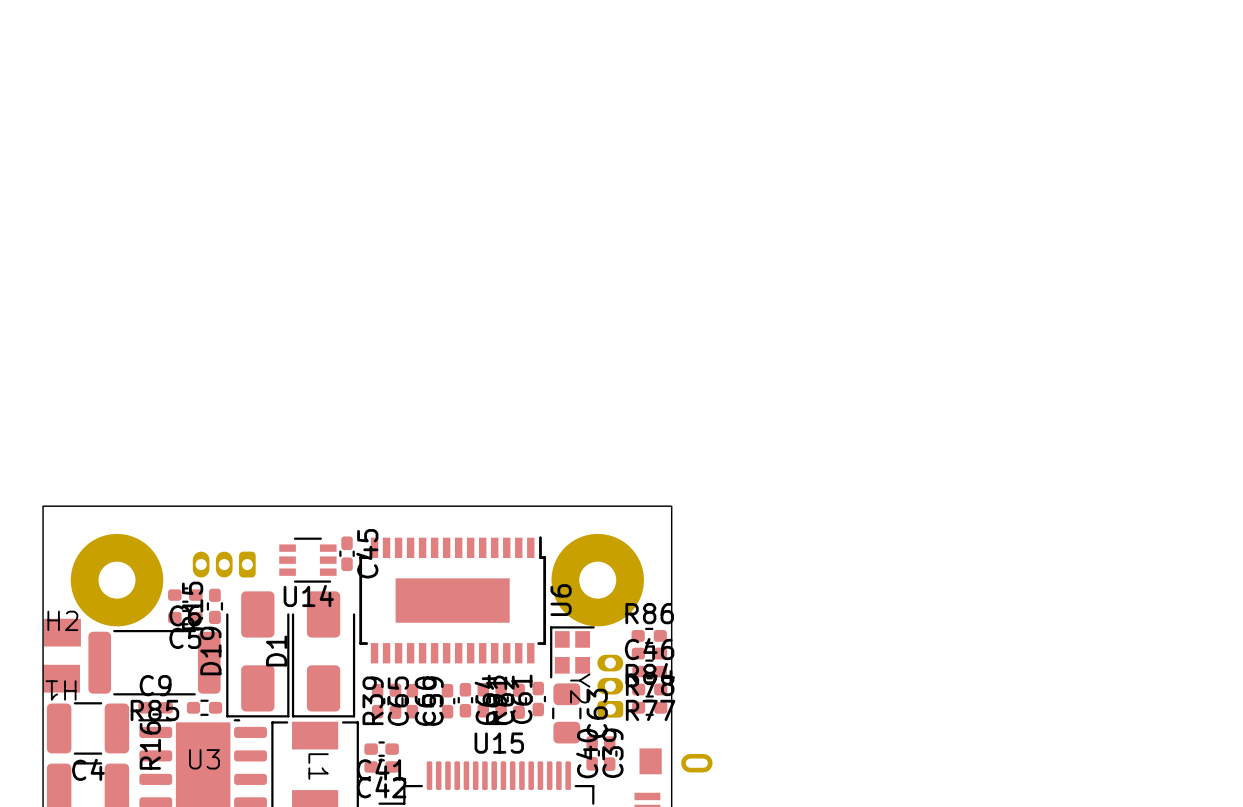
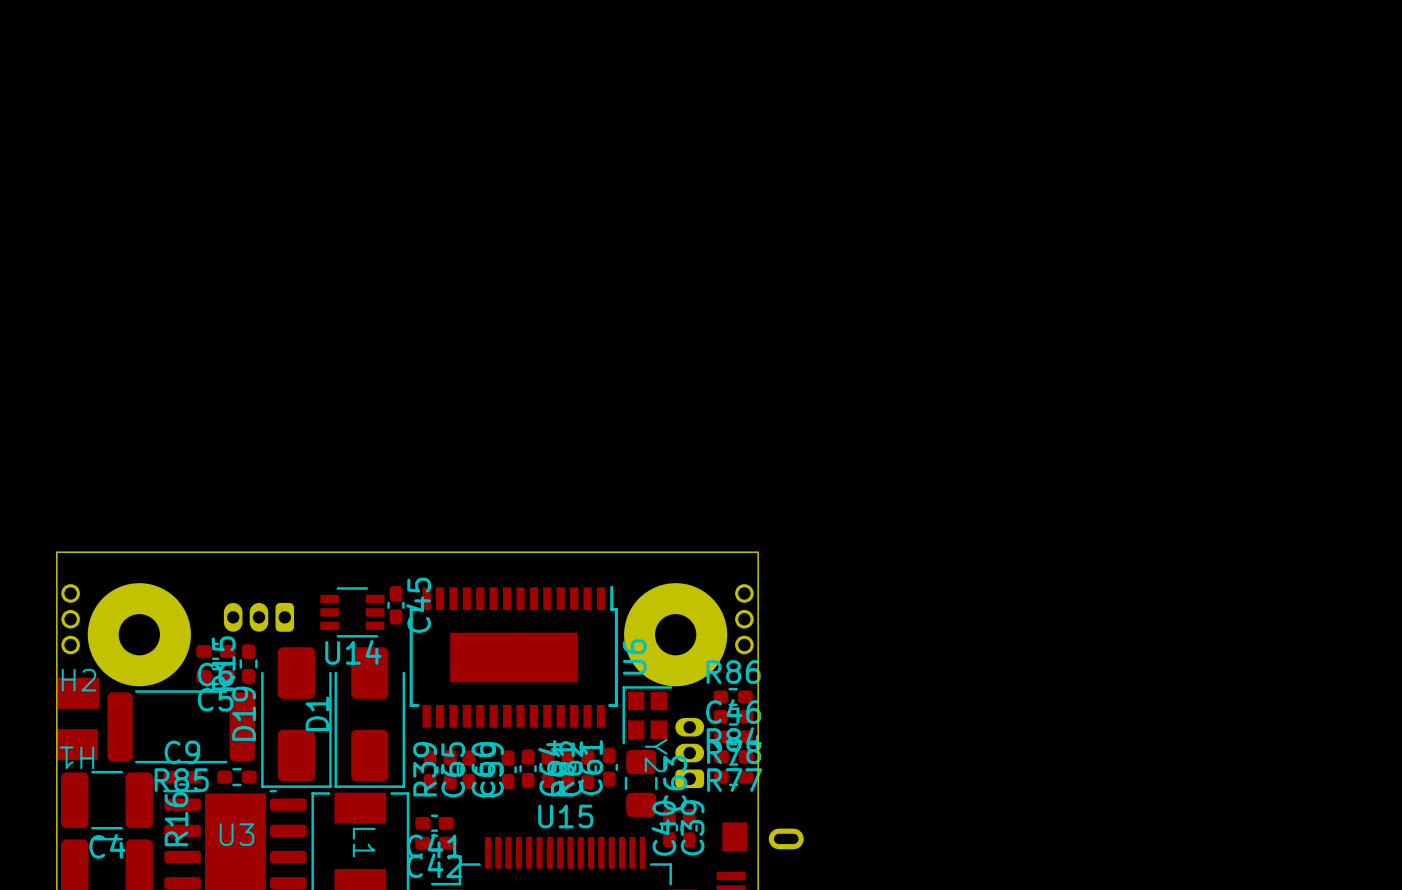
part: none -> (70, 619)
part: none -> (744, 619)

